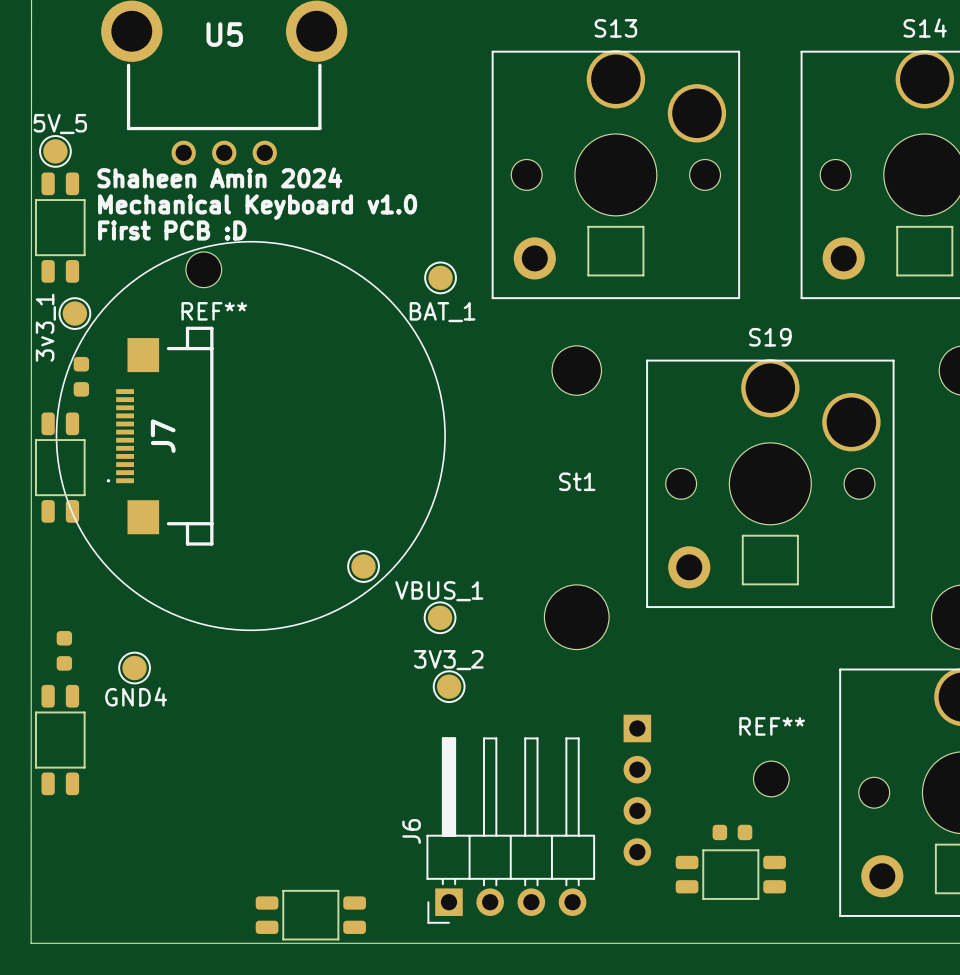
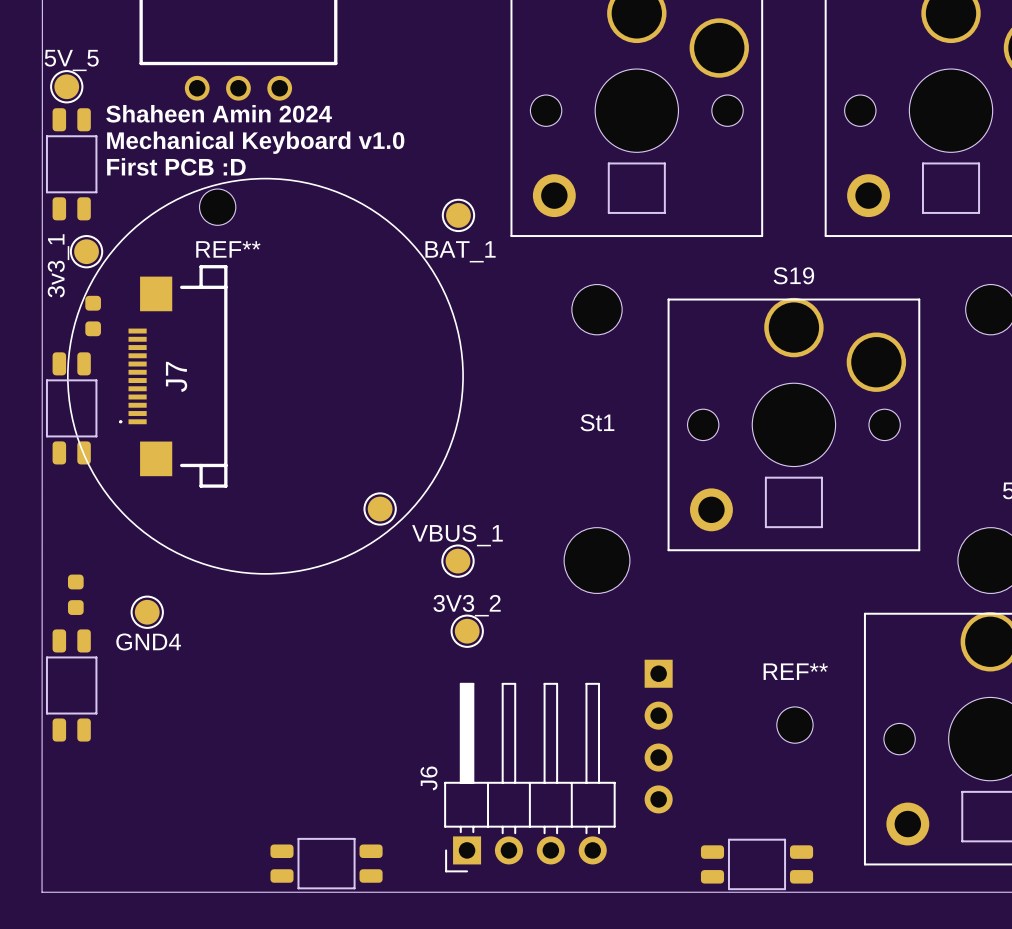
part: (732, 832) -> none
part position: (730, 874) -> (757, 864)

